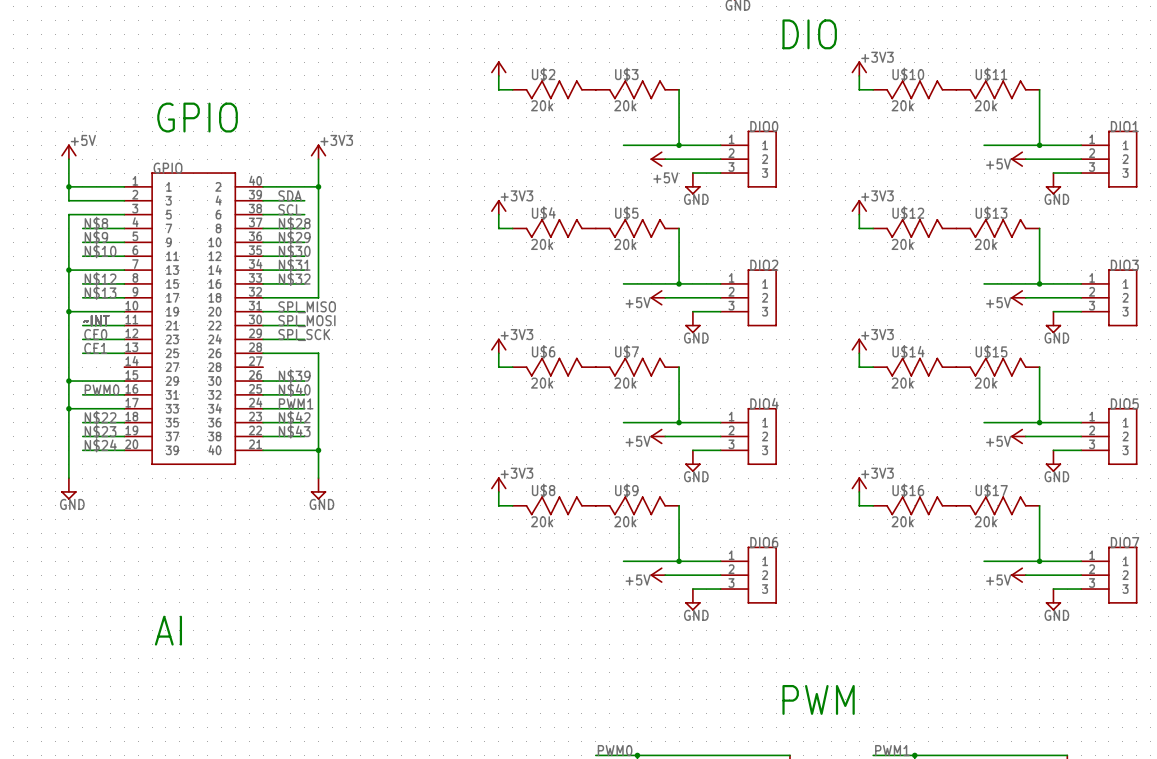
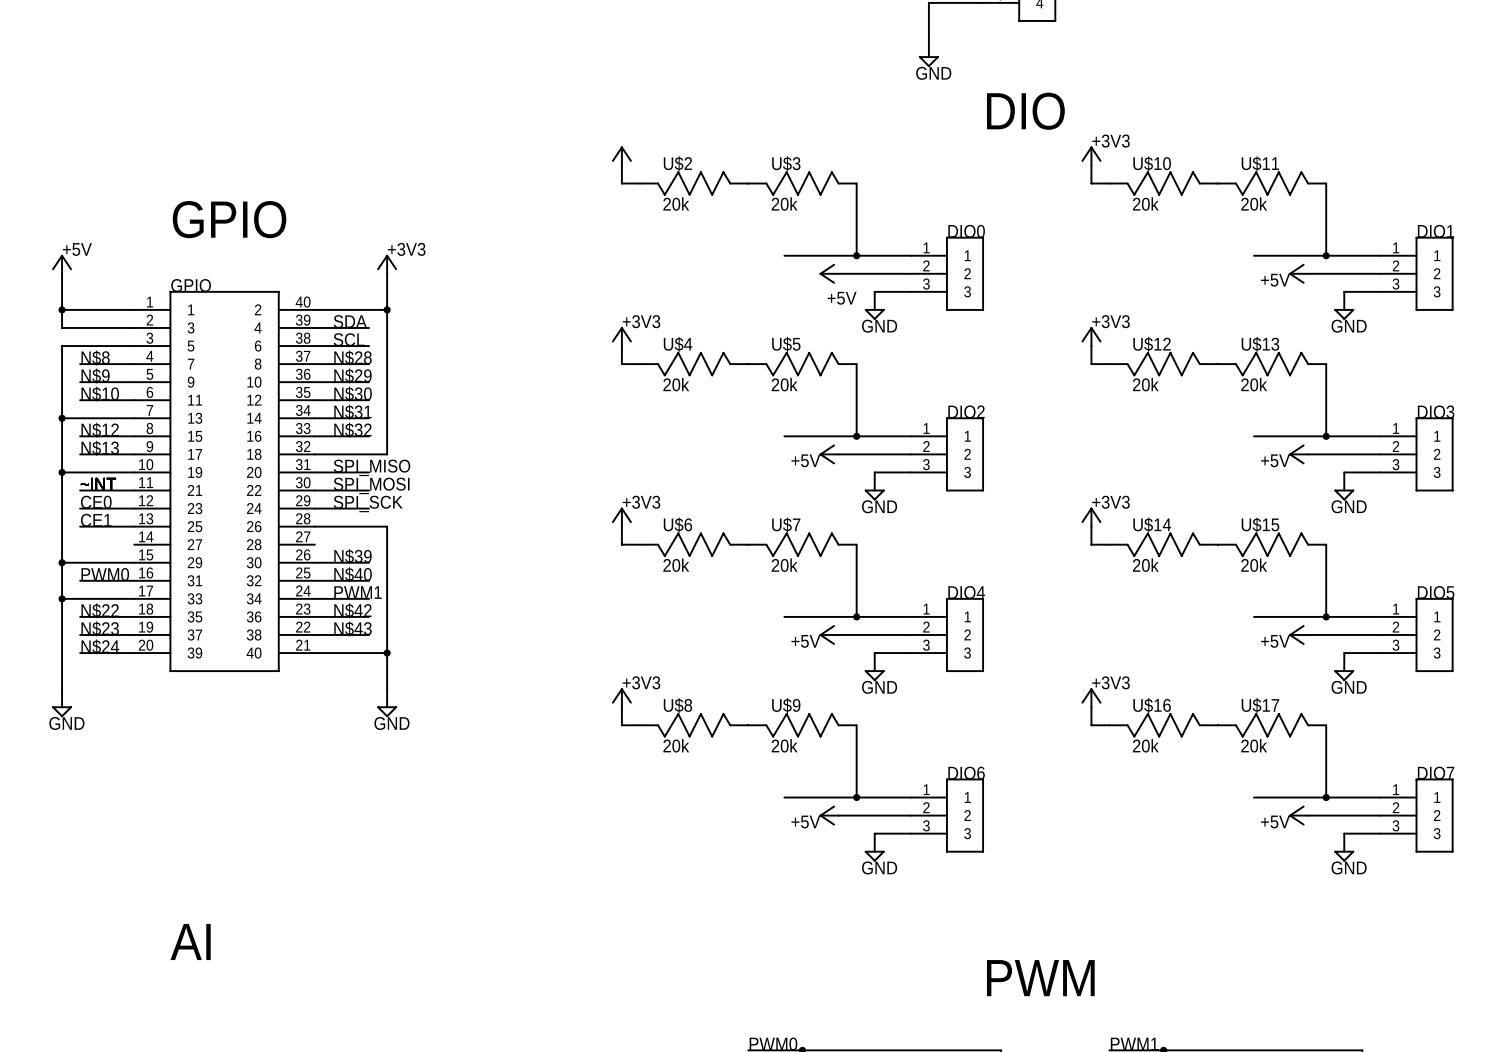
text position: AI (168, 630) -> AI (190, 941)

